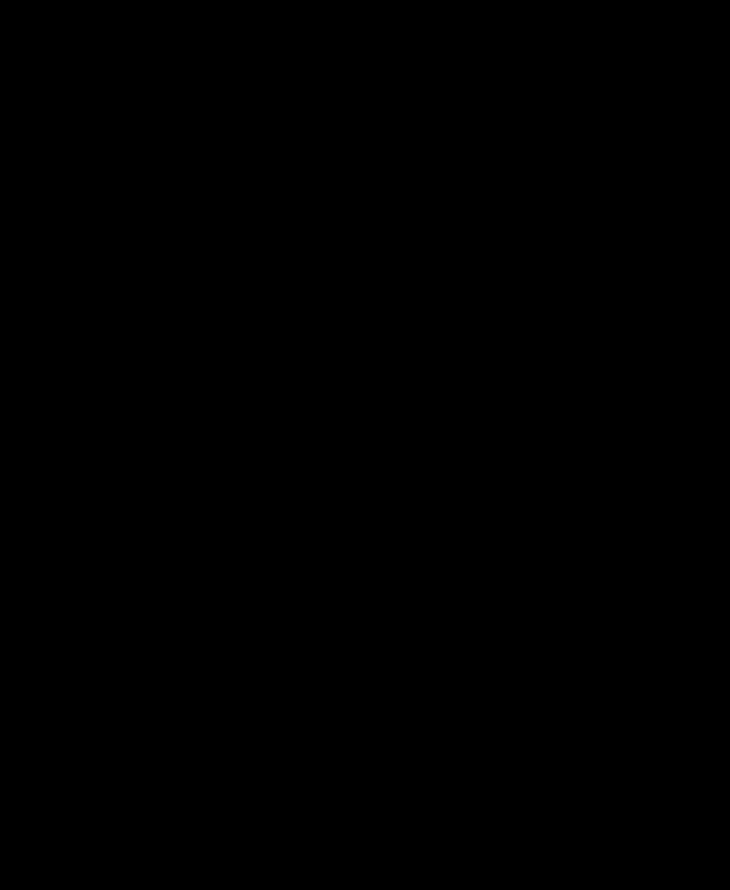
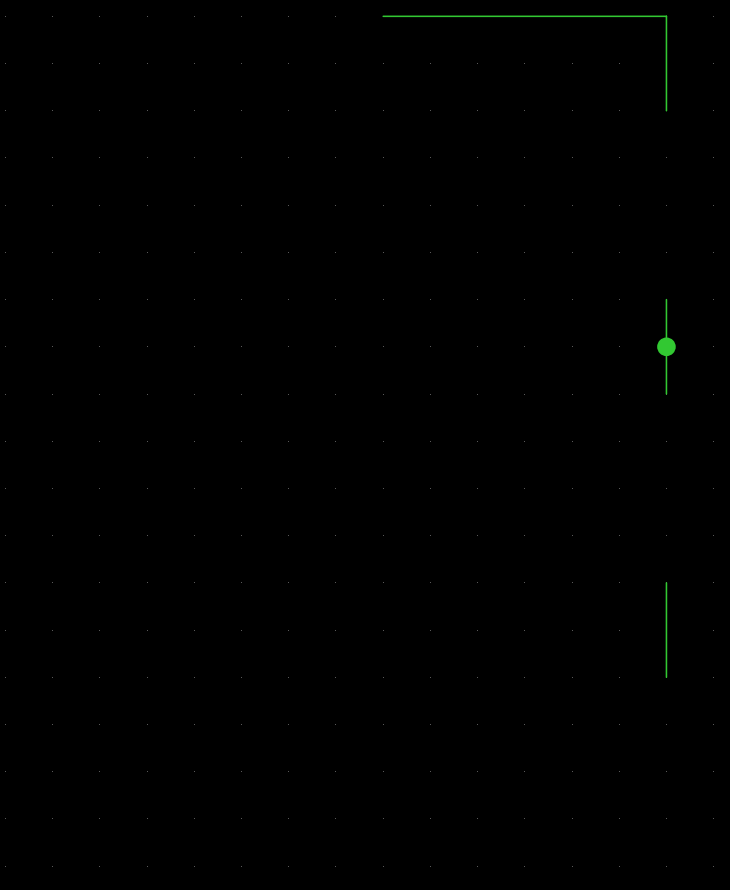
wire: none -> (383, 16) (666, 16) (666, 110)
wire: none -> (666, 299) (666, 394)
junction: none -> (666, 346)
wire: none -> (666, 582) (666, 677)

